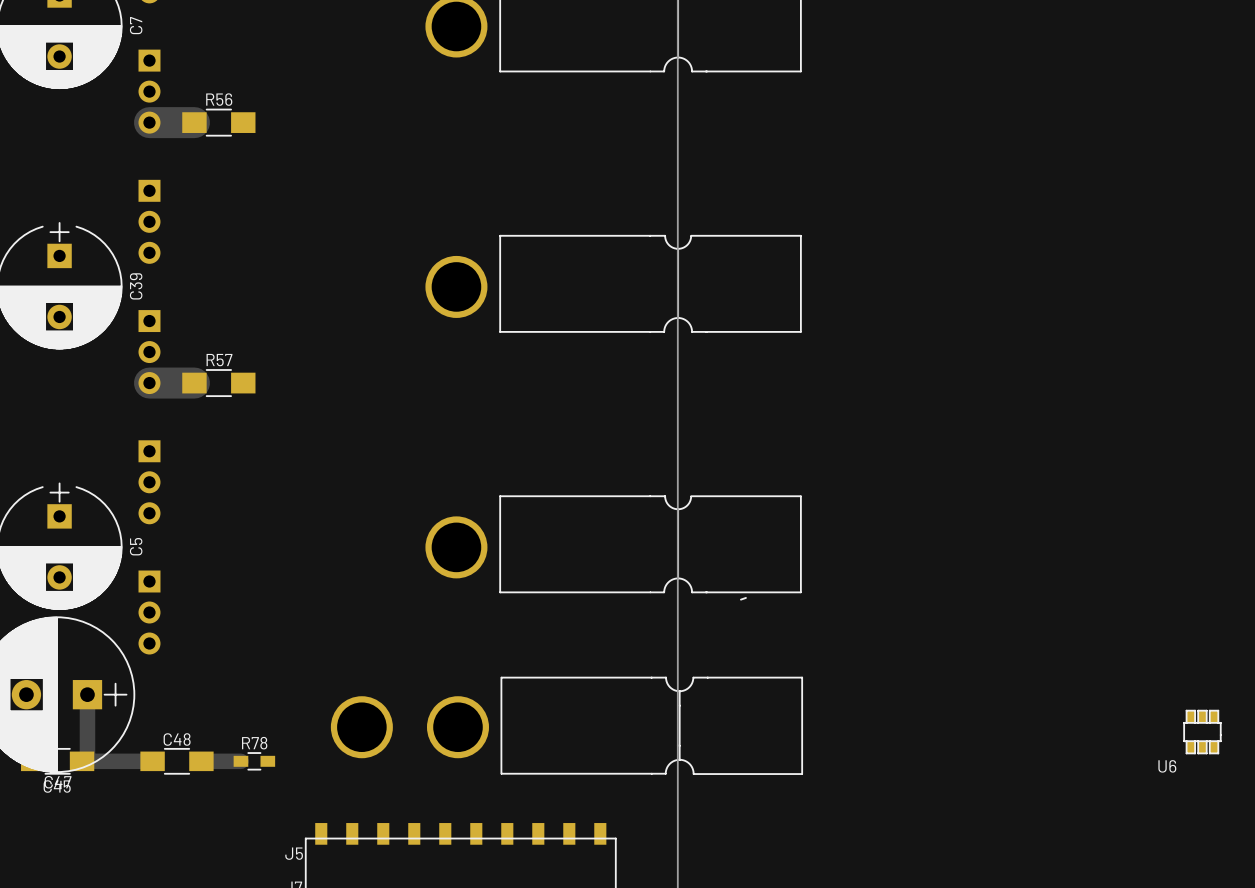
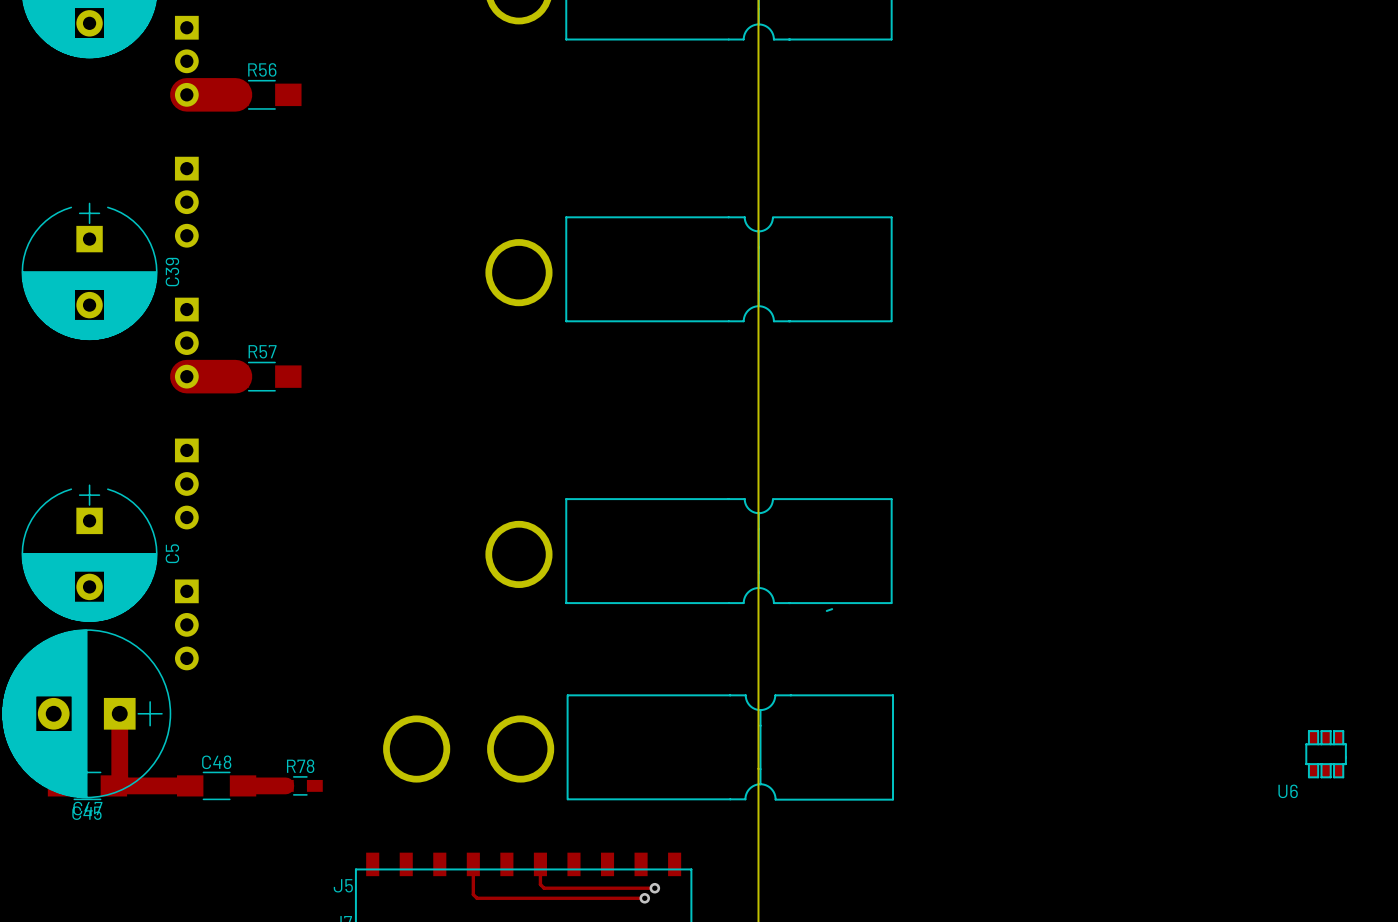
track: none -> (473, 864) (473, 894) (477, 898) (644, 898)
track: none -> (540, 864) (540, 884) (544, 888) (654, 888)
via: none -> (654, 888)
via: none -> (644, 898)

